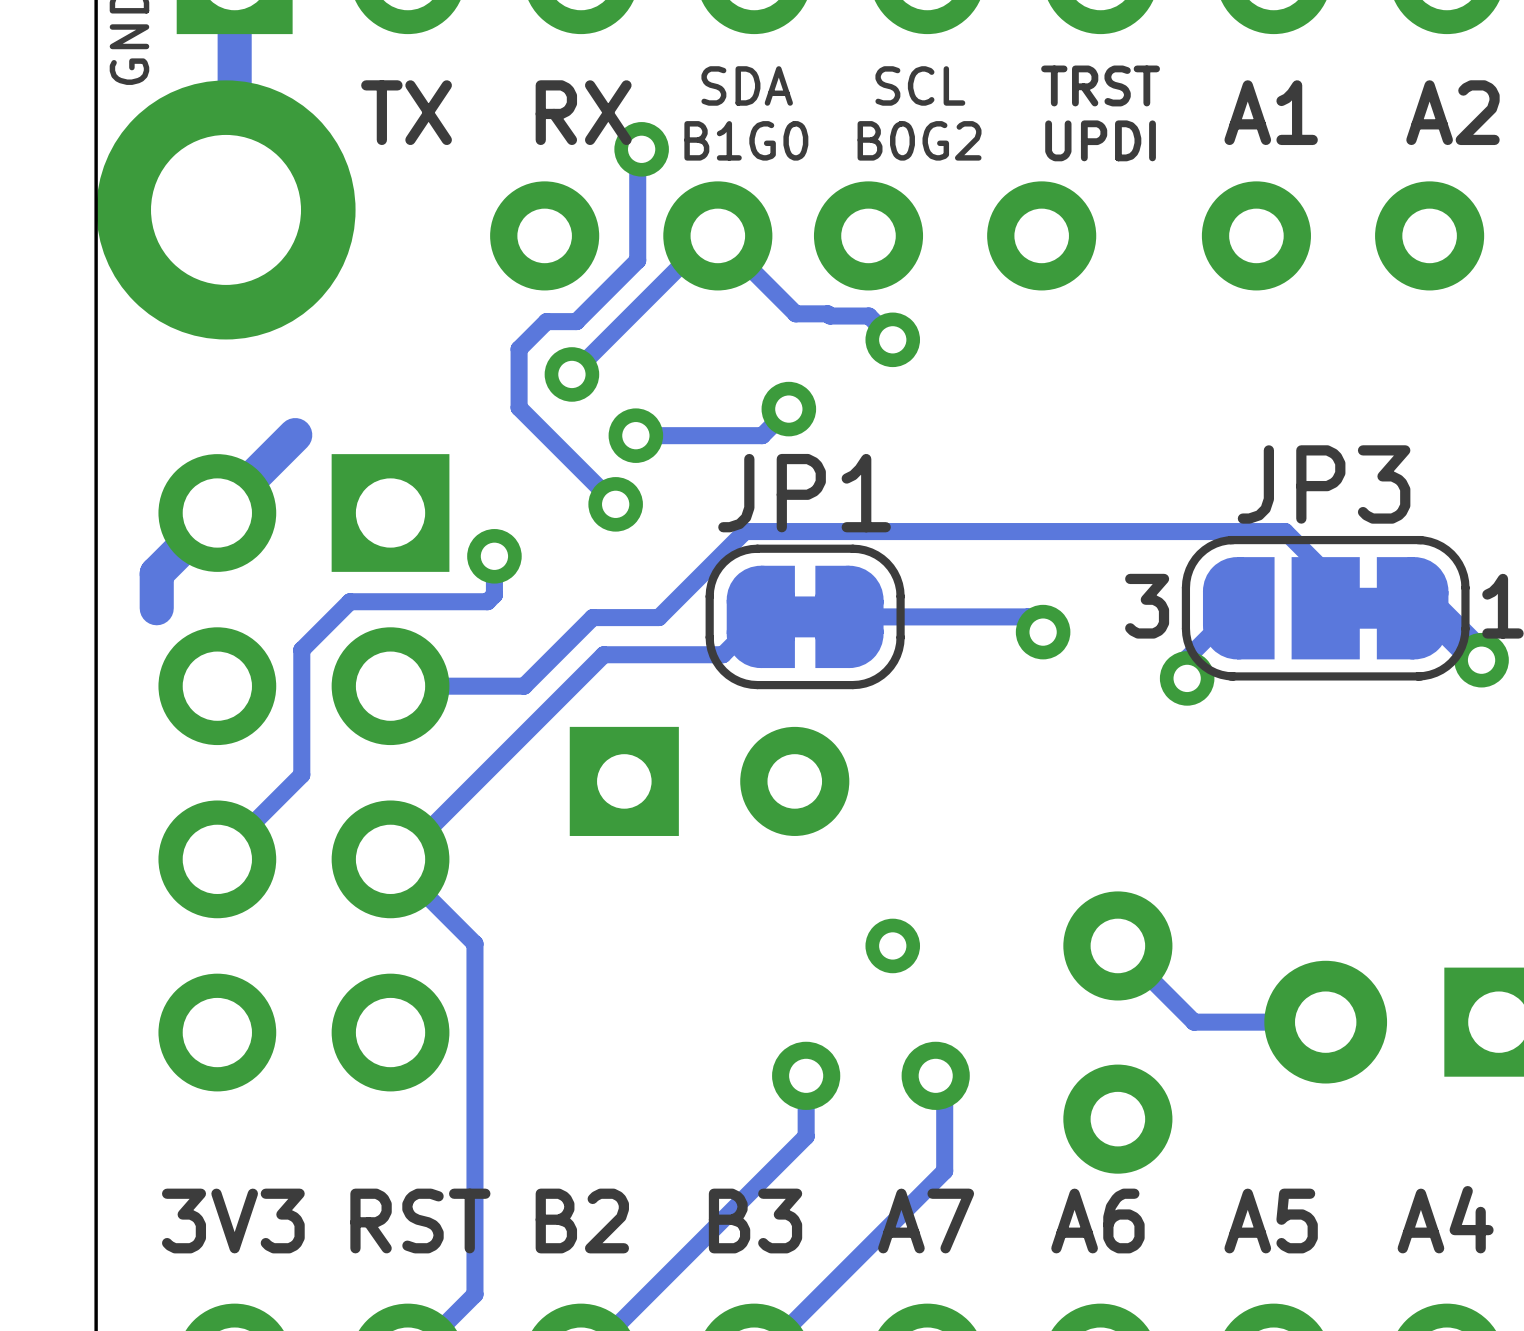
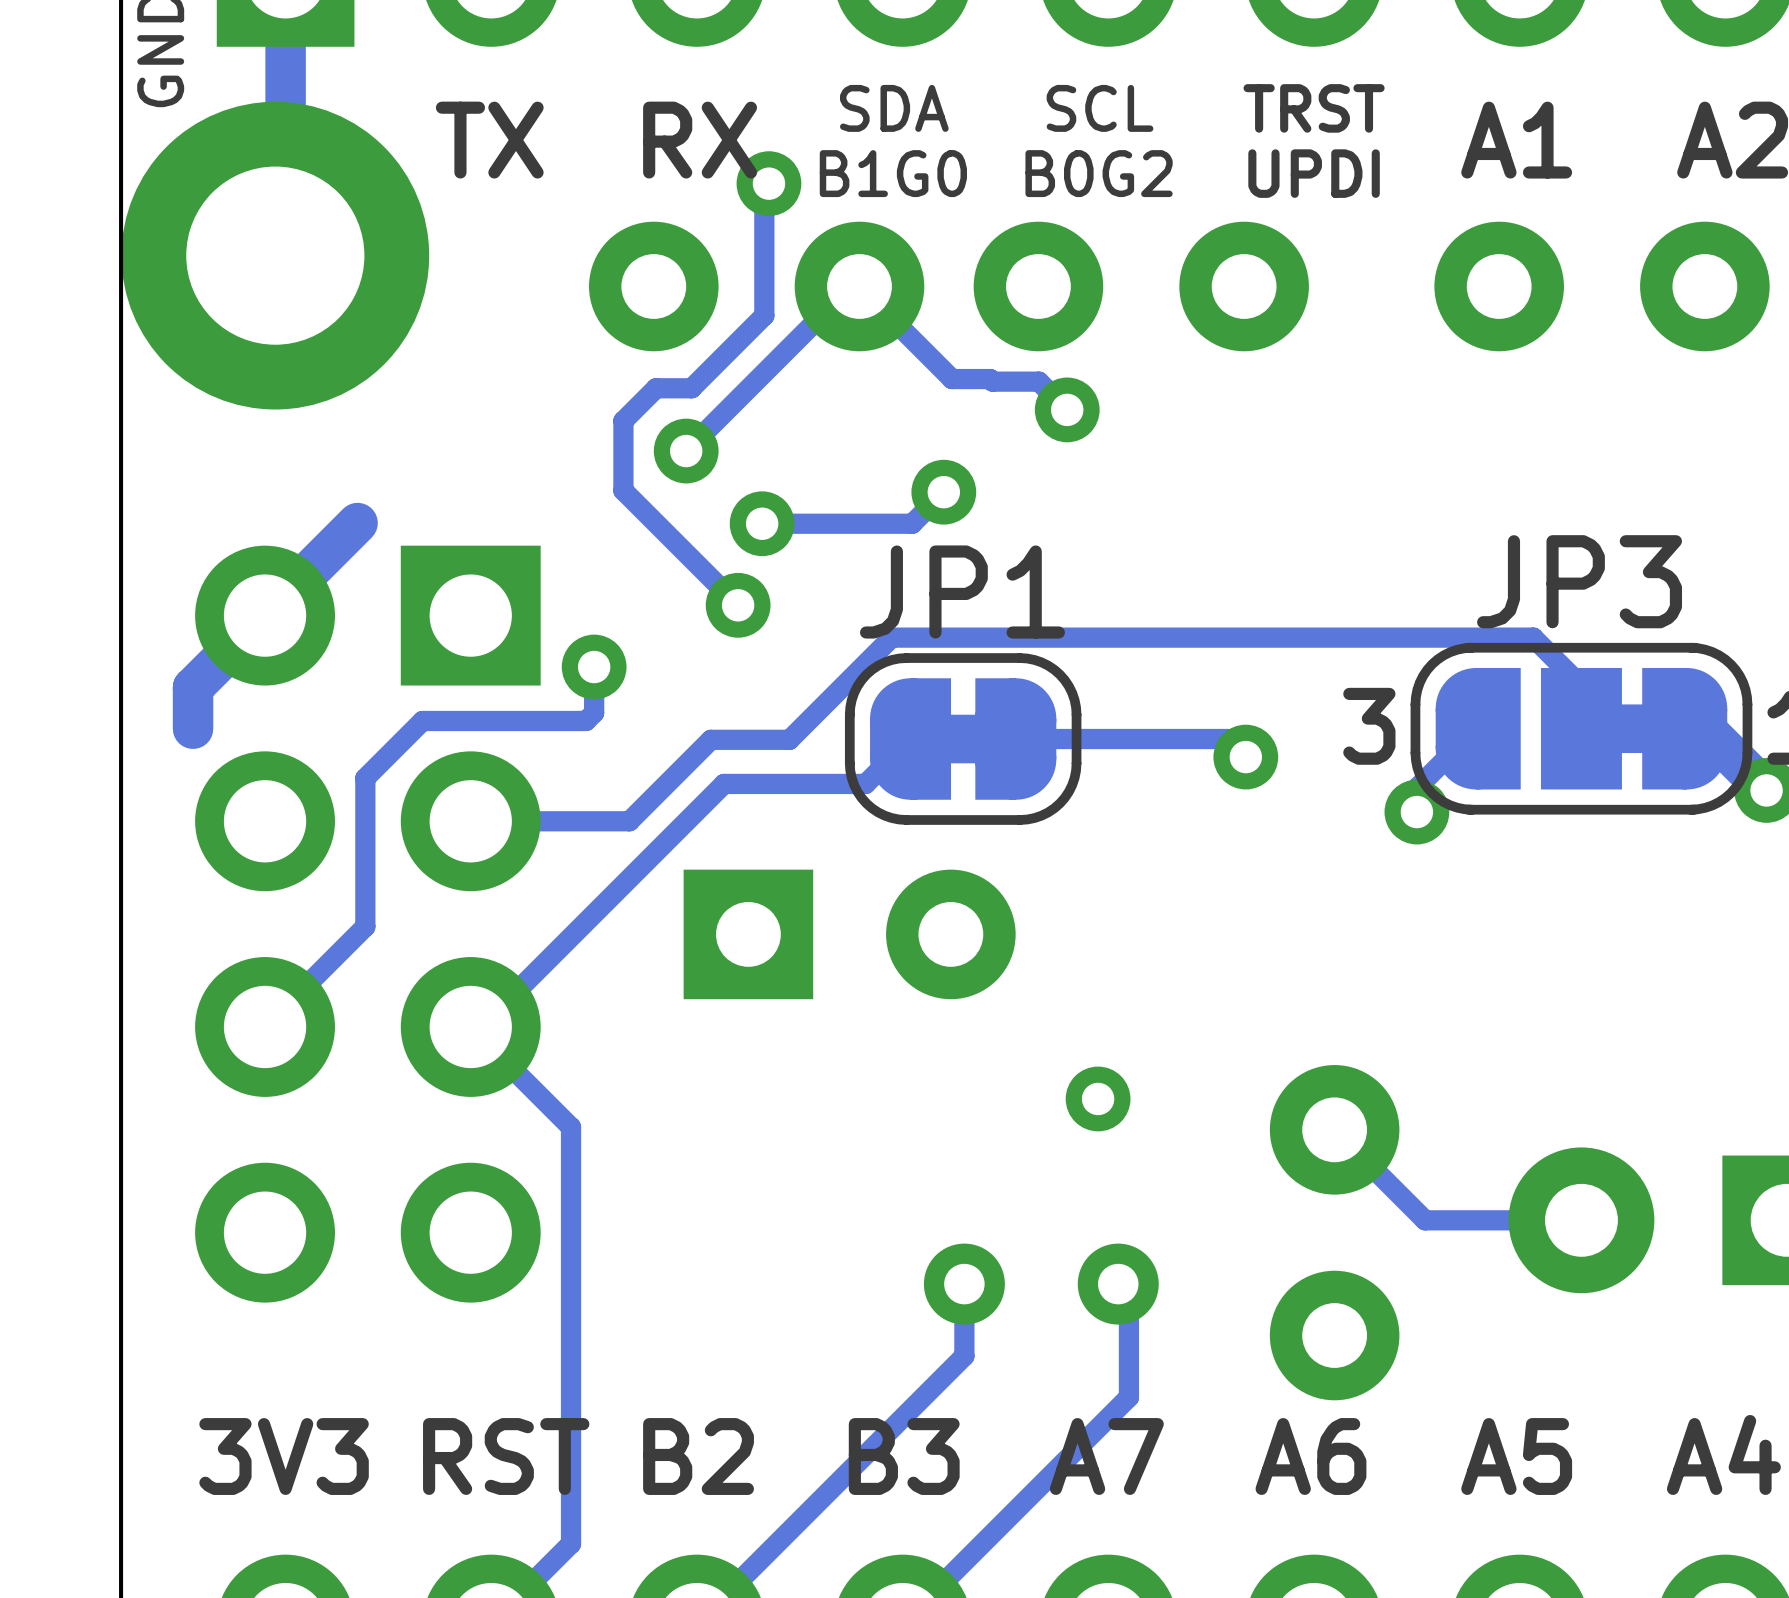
via position: (892, 945) -> (1098, 1098)

